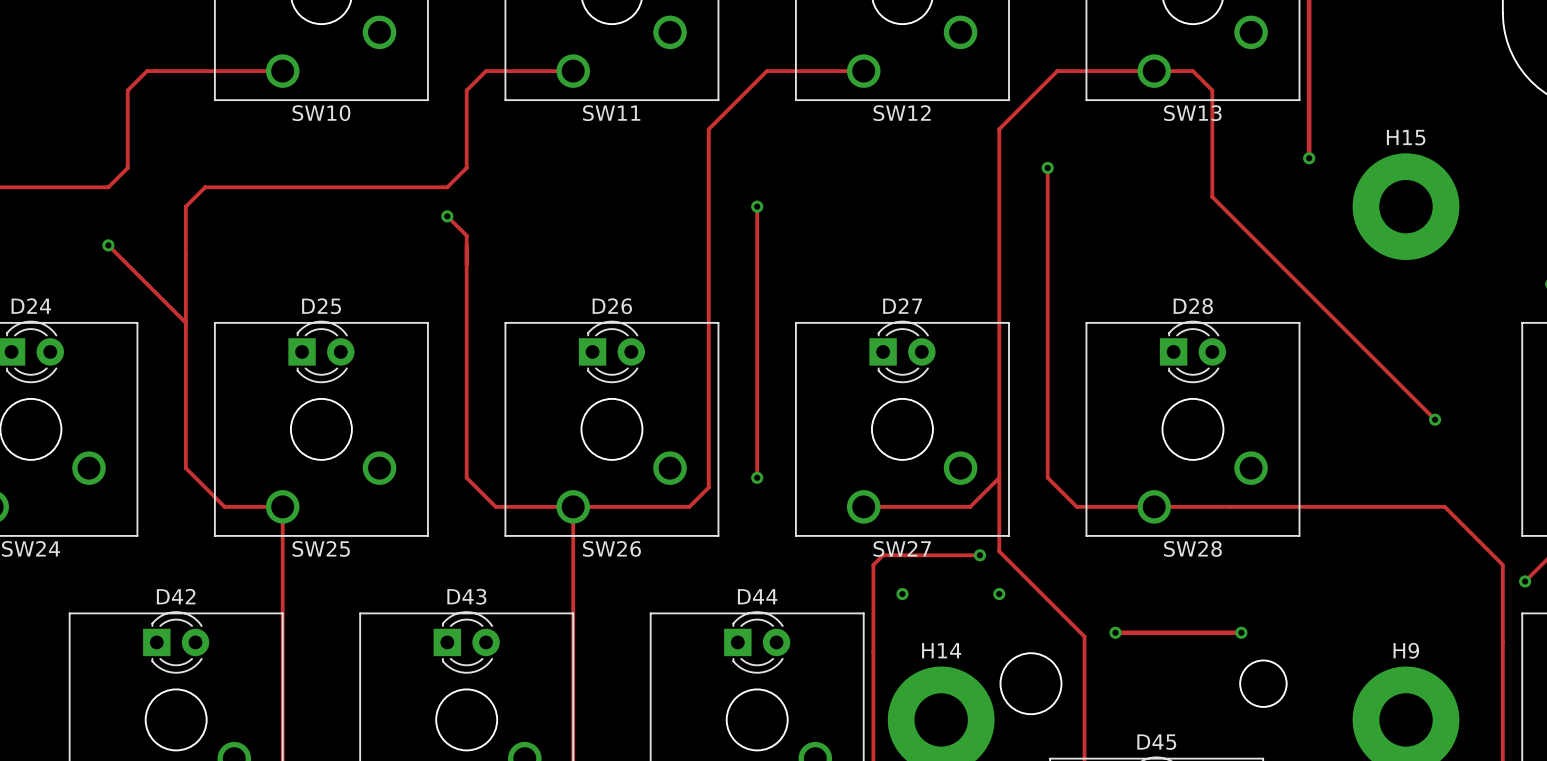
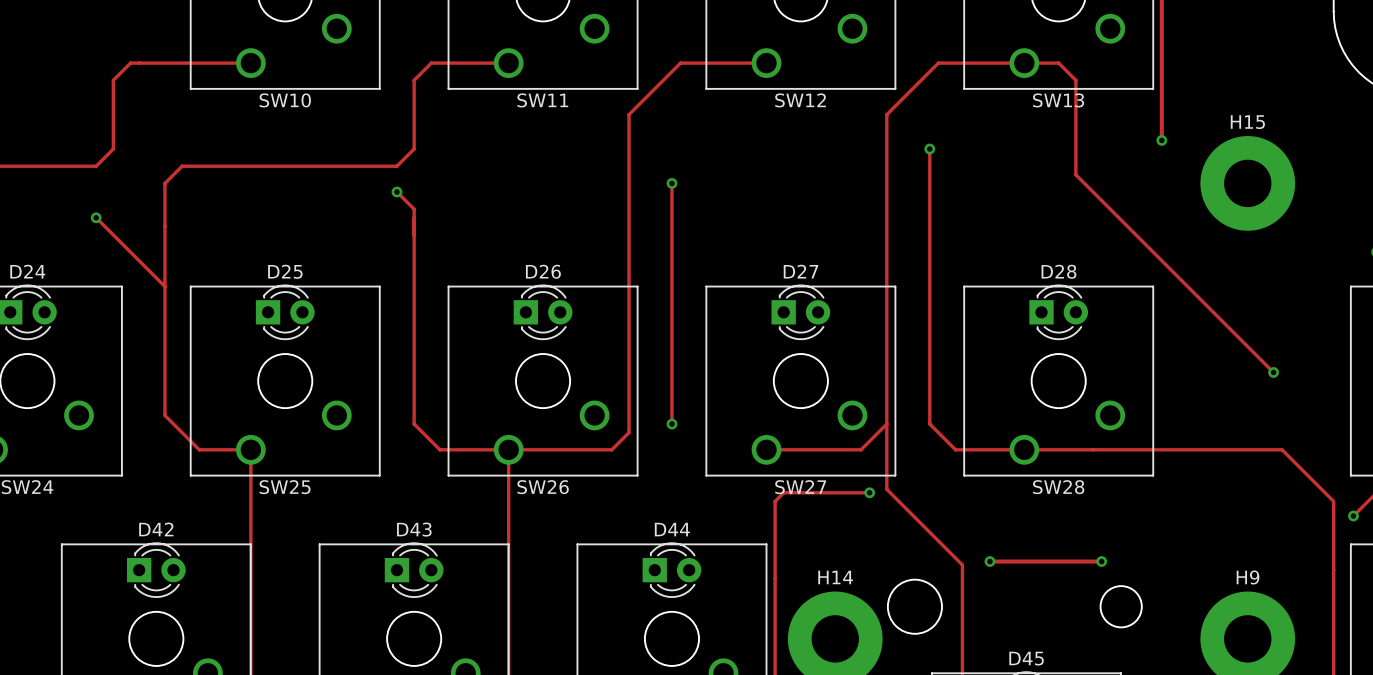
via: (902, 594) -> none
via: (999, 594) -> none

